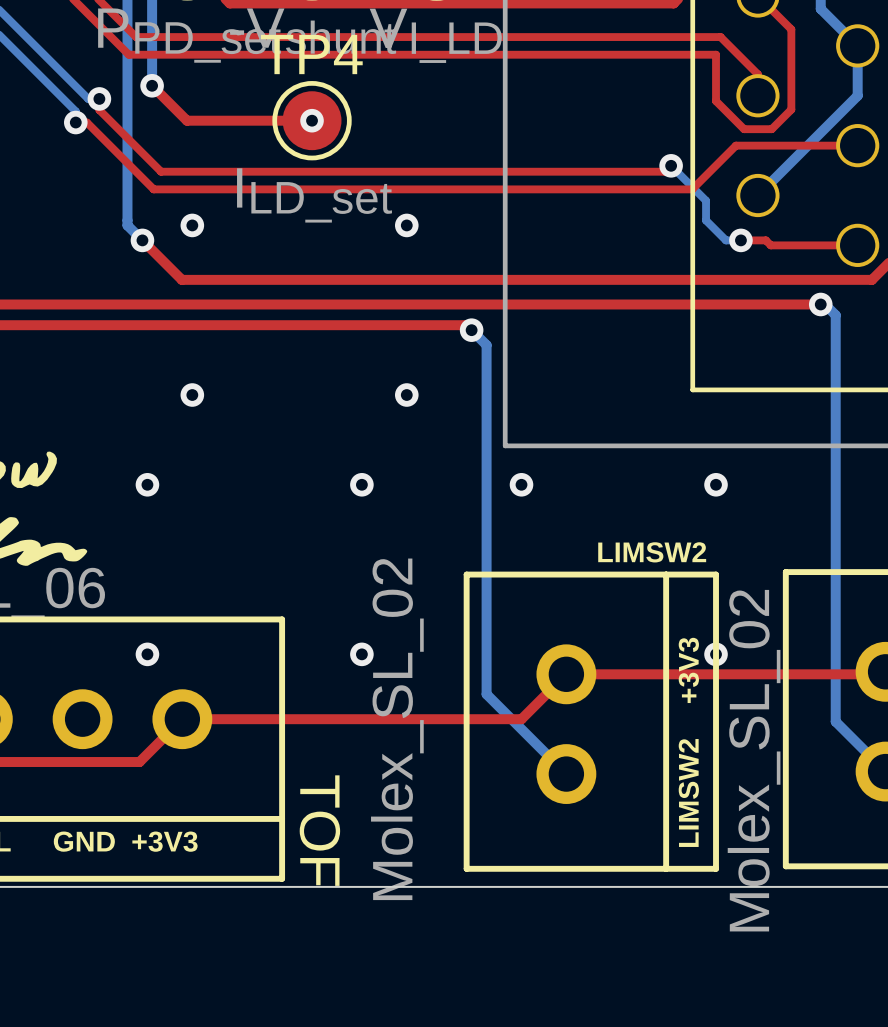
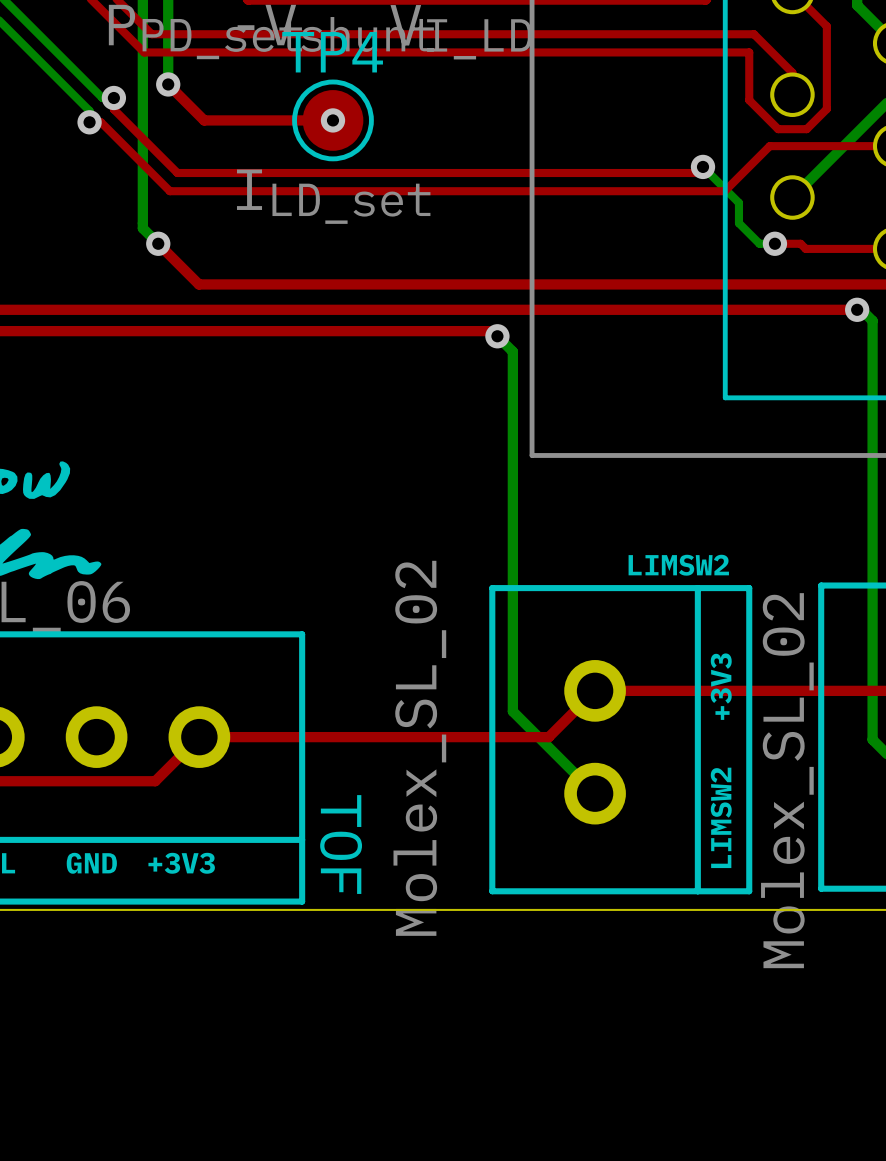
via: (192, 225) -> none
via: (406, 225) -> none
via: (192, 395) -> none
via: (406, 395) -> none
via: (147, 484) -> none
via: (361, 484) -> none
via: (521, 484) -> none
via: (716, 484) -> none
via: (147, 654) -> none
via: (361, 654) -> none
via: (716, 654) -> none

